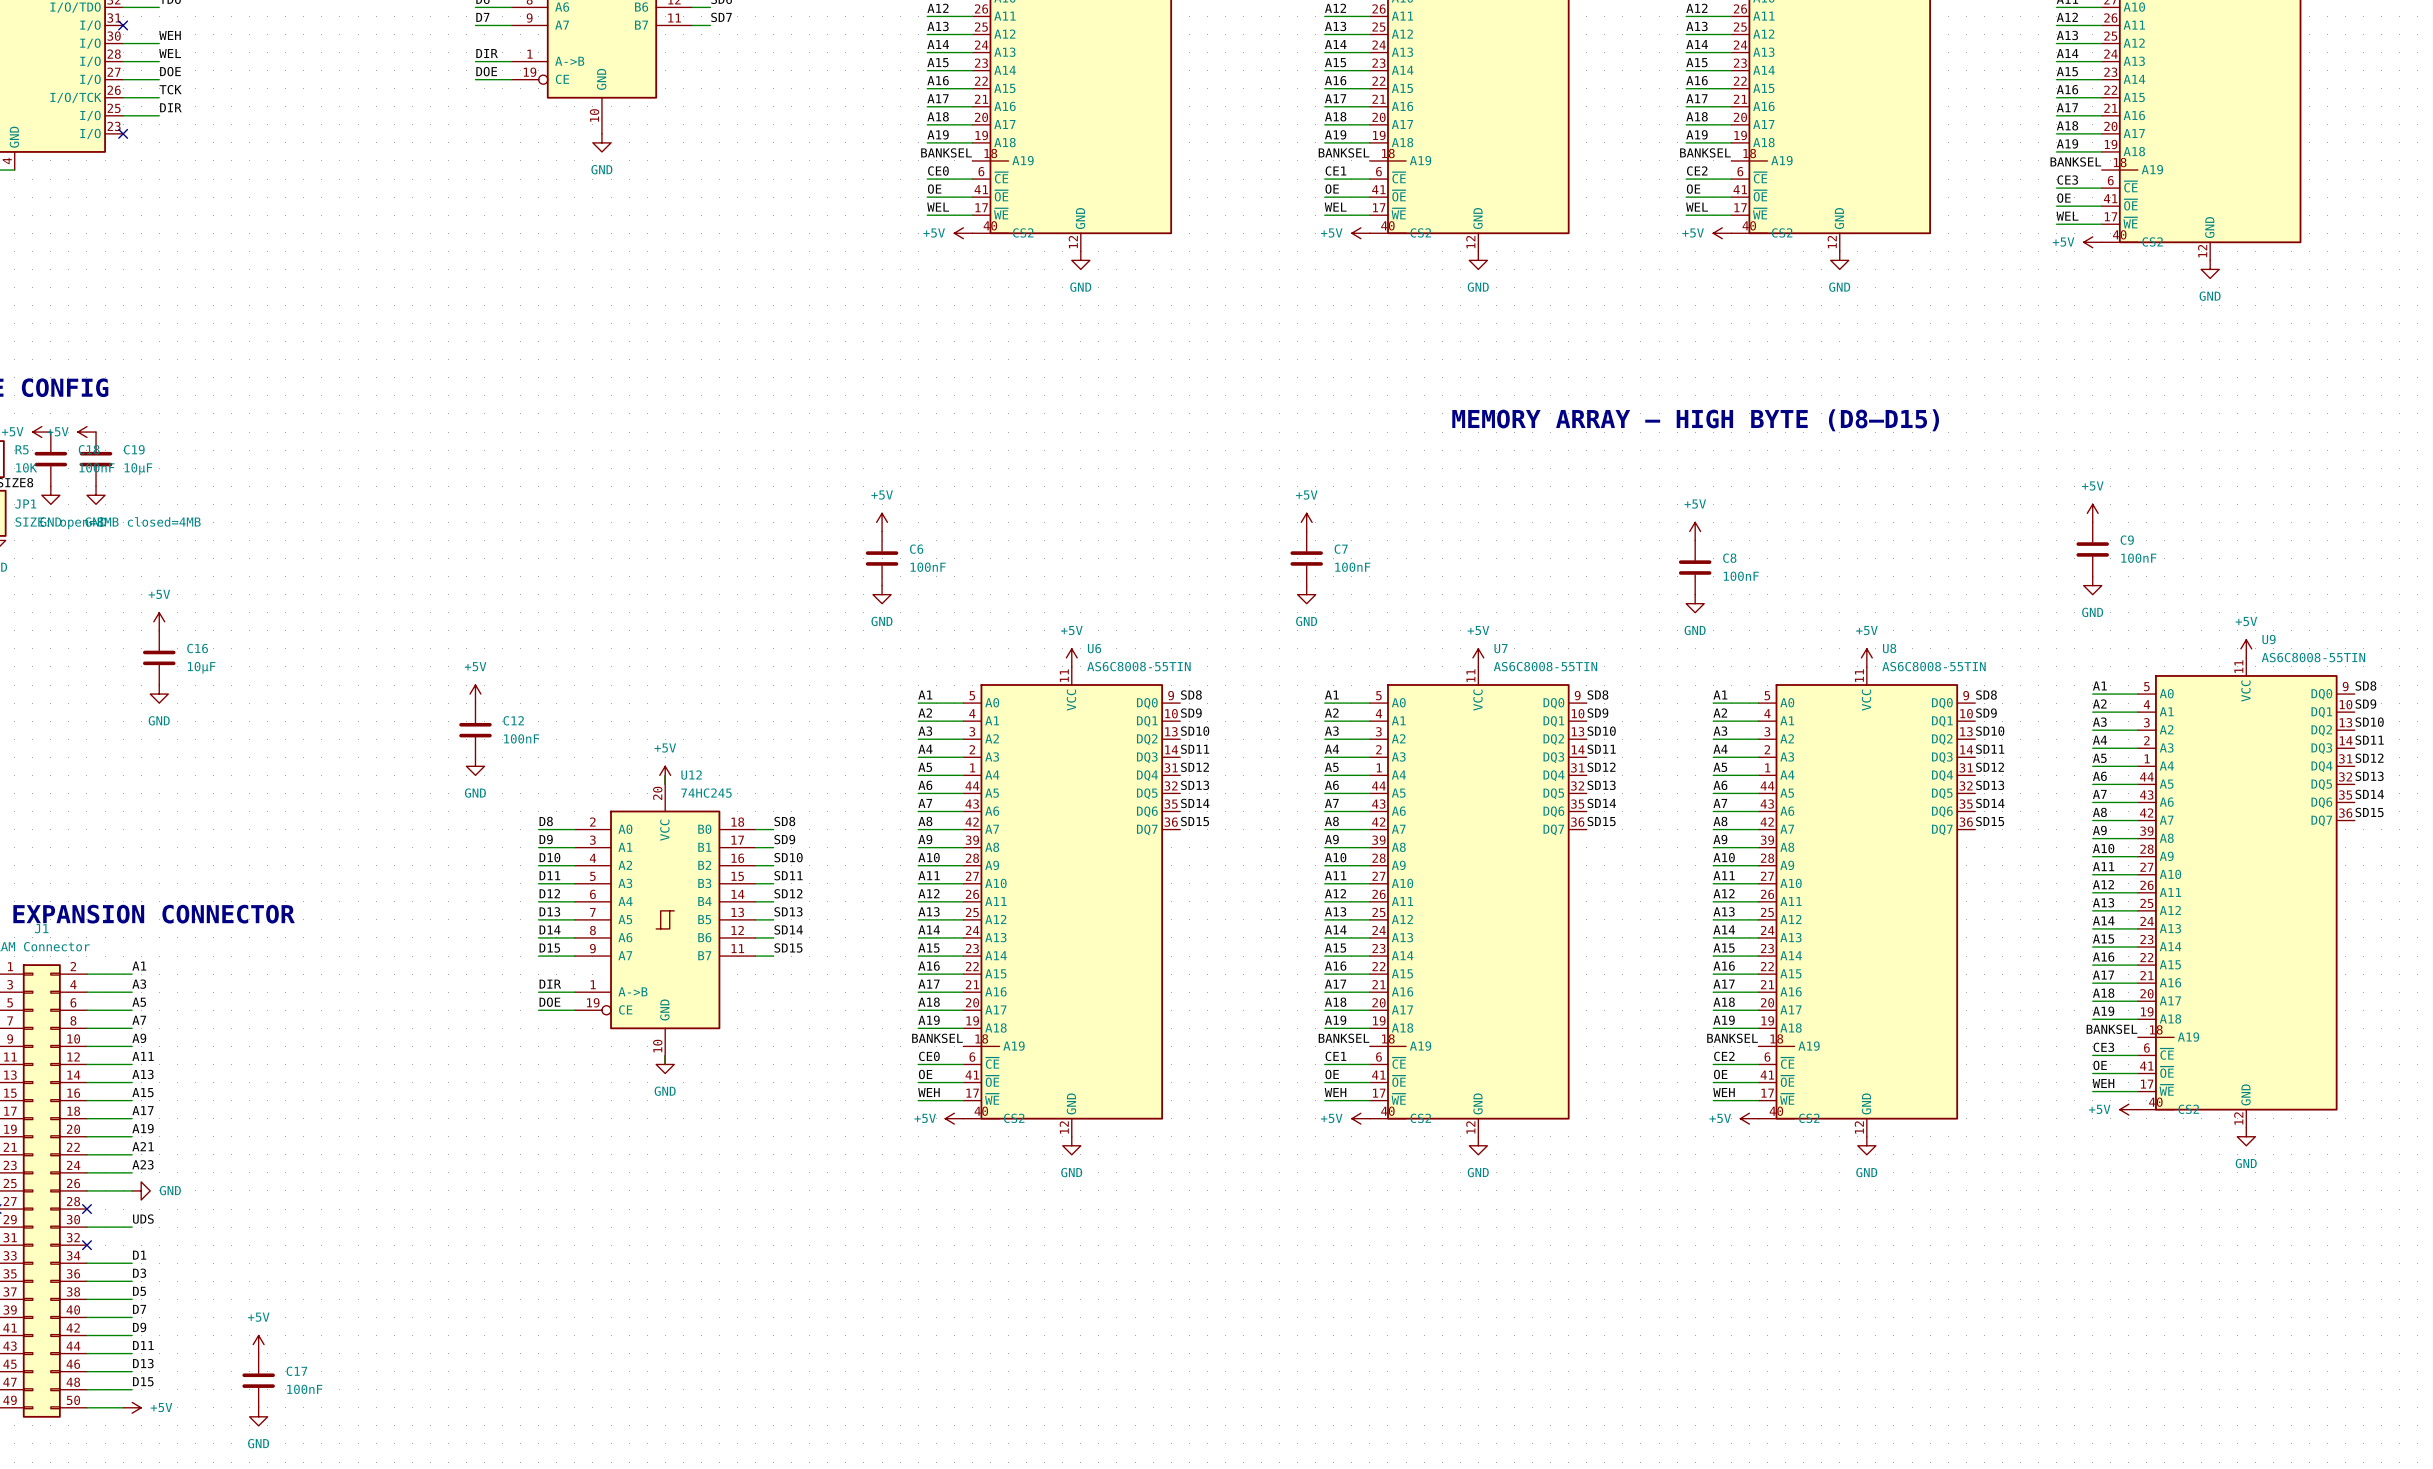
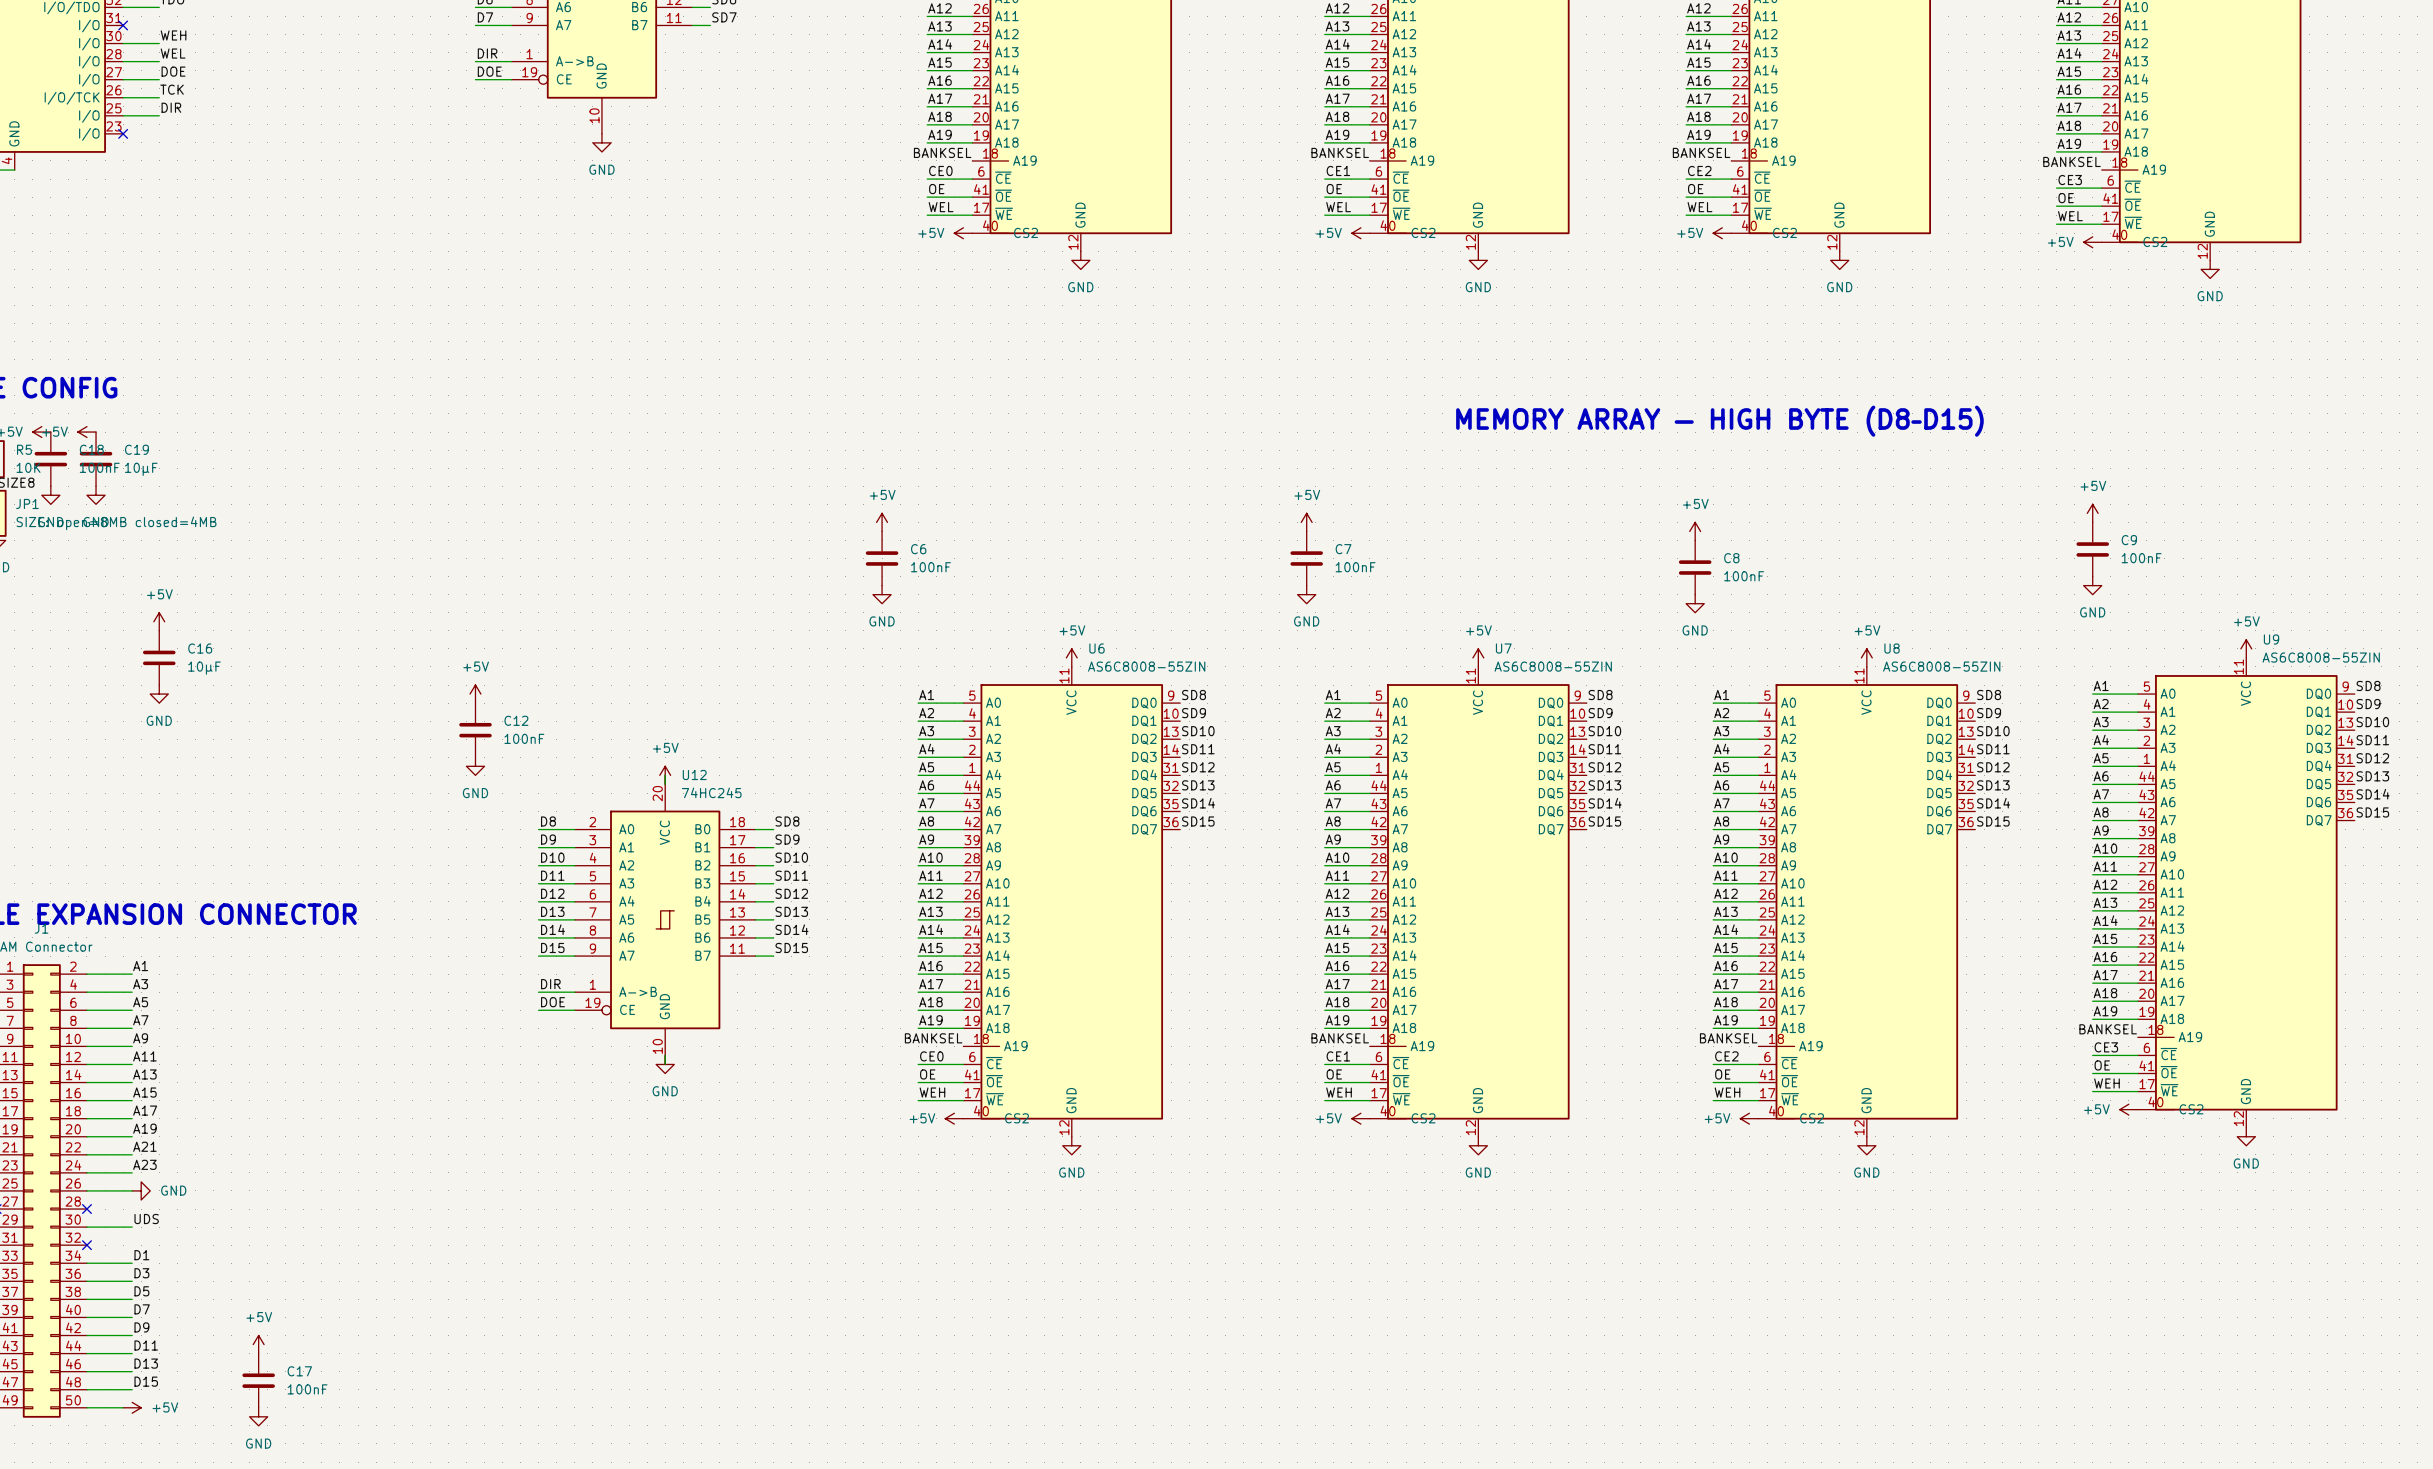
U9 value: AS6C8008-55TIN (2313, 657) -> AS6C8008-55ZIN (2321, 657)
U6 value: AS6C8008-55TIN (1138, 666) -> AS6C8008-55ZIN (1146, 666)
U7 value: AS6C8008-55TIN (1545, 666) -> AS6C8008-55ZIN (1553, 666)
U8 value: AS6C8008-55TIN (1934, 666) -> AS6C8008-55ZIN (1941, 666)

